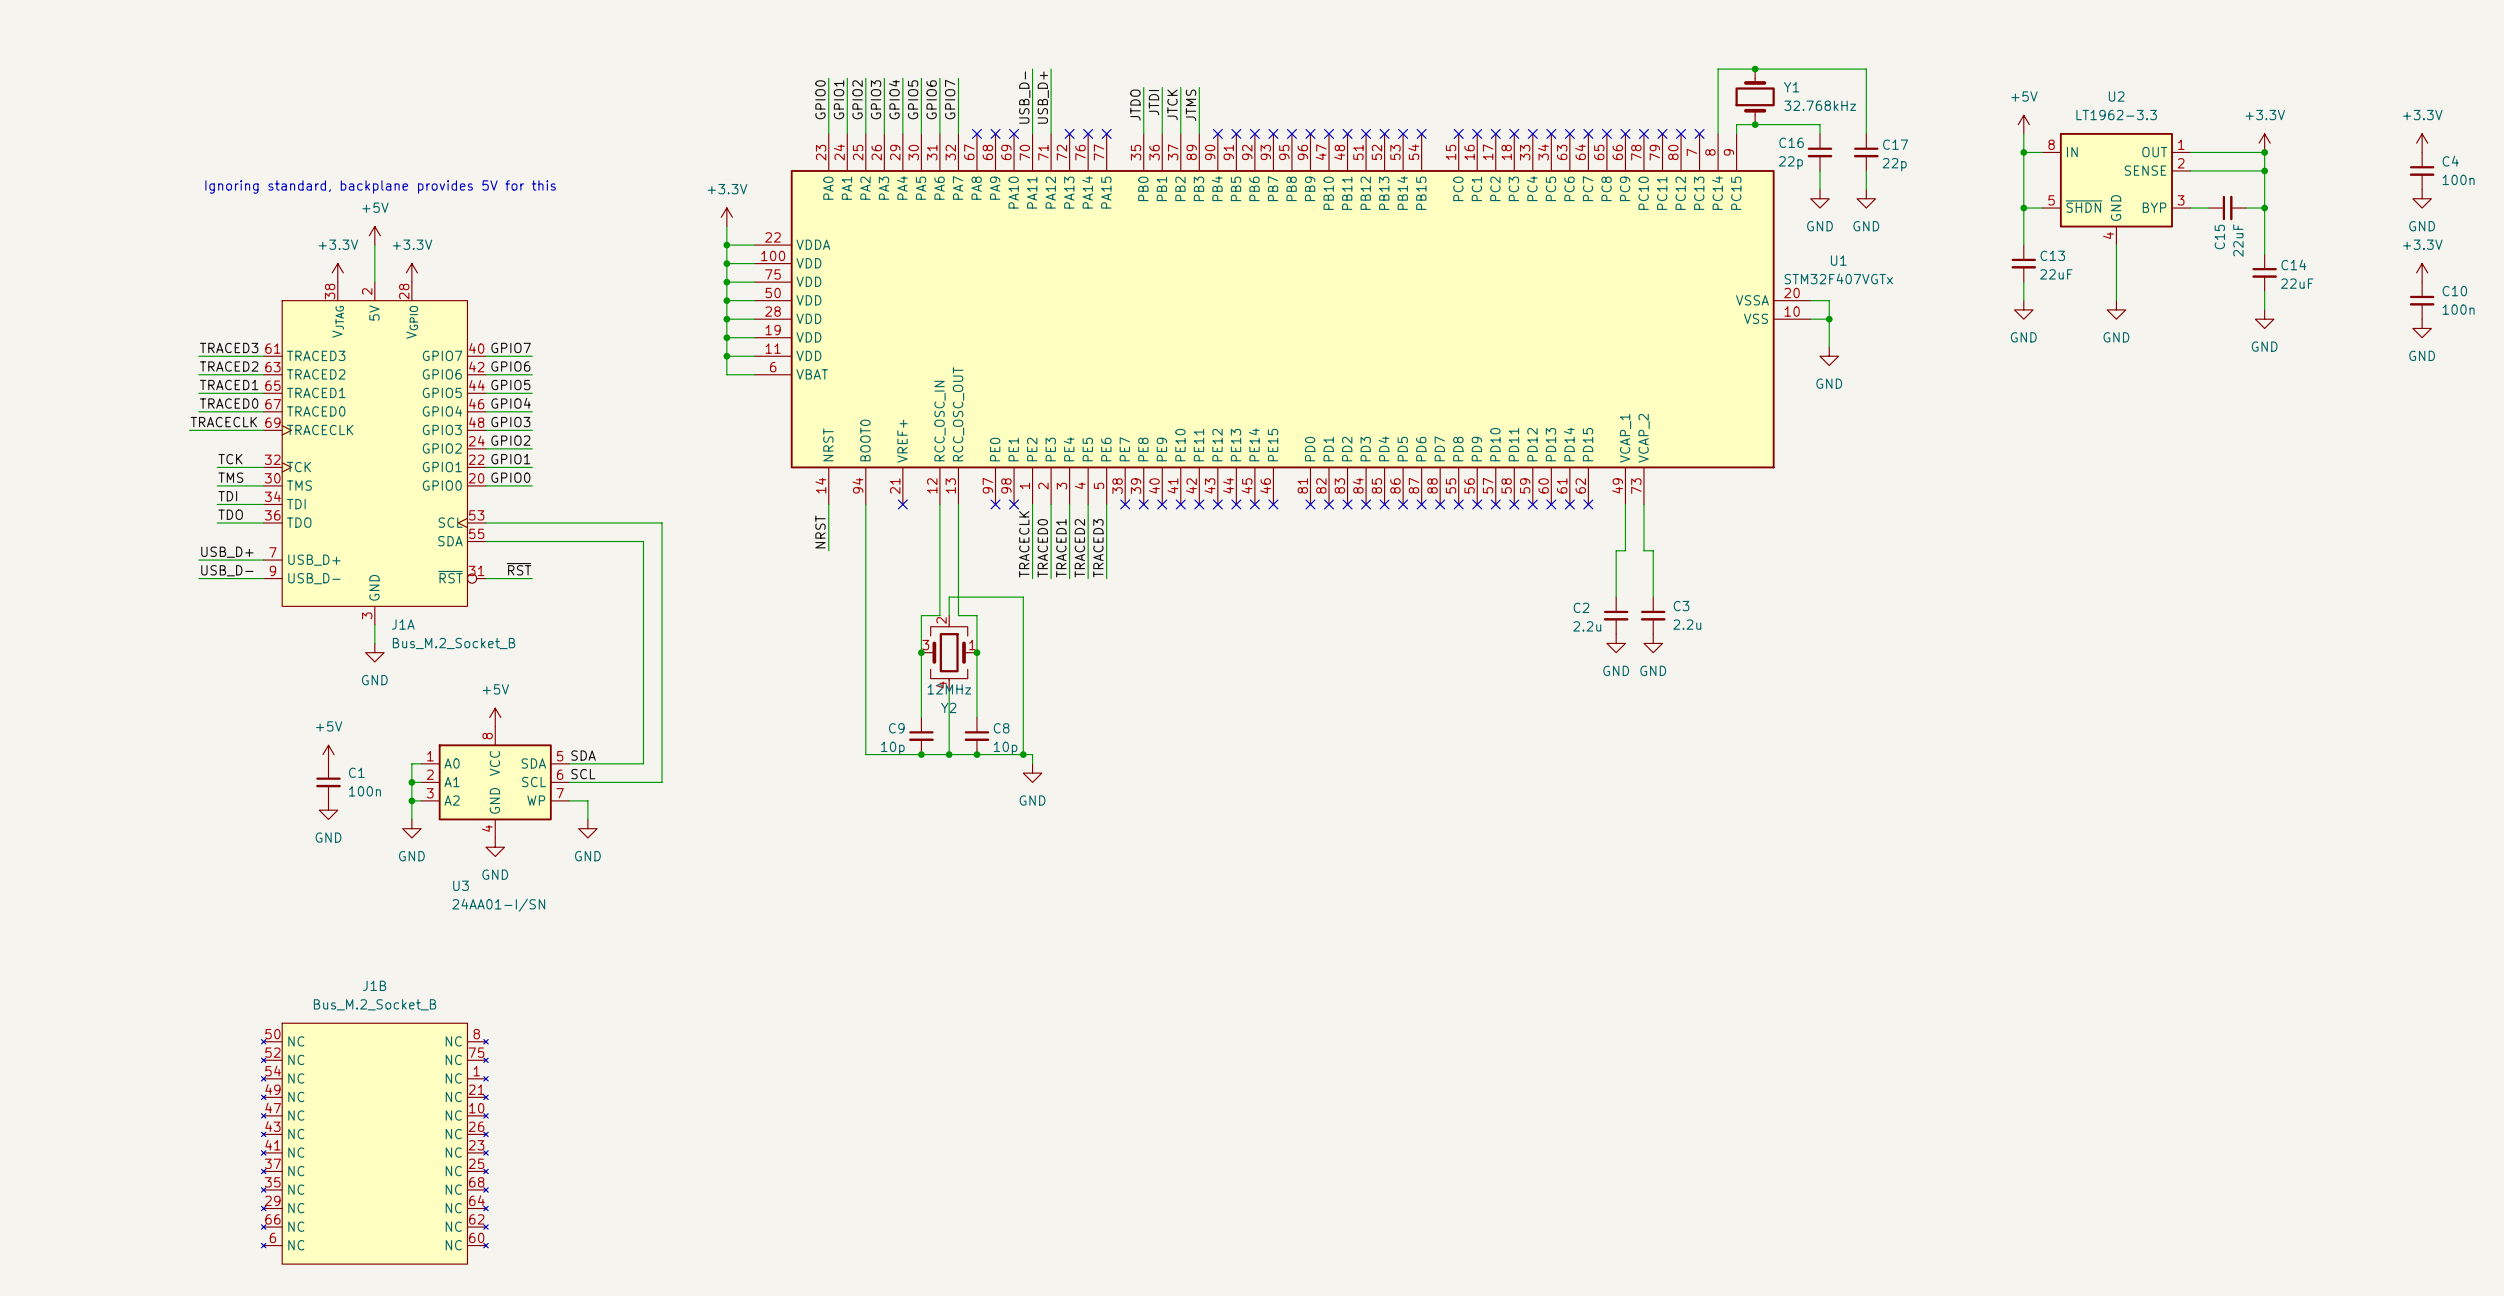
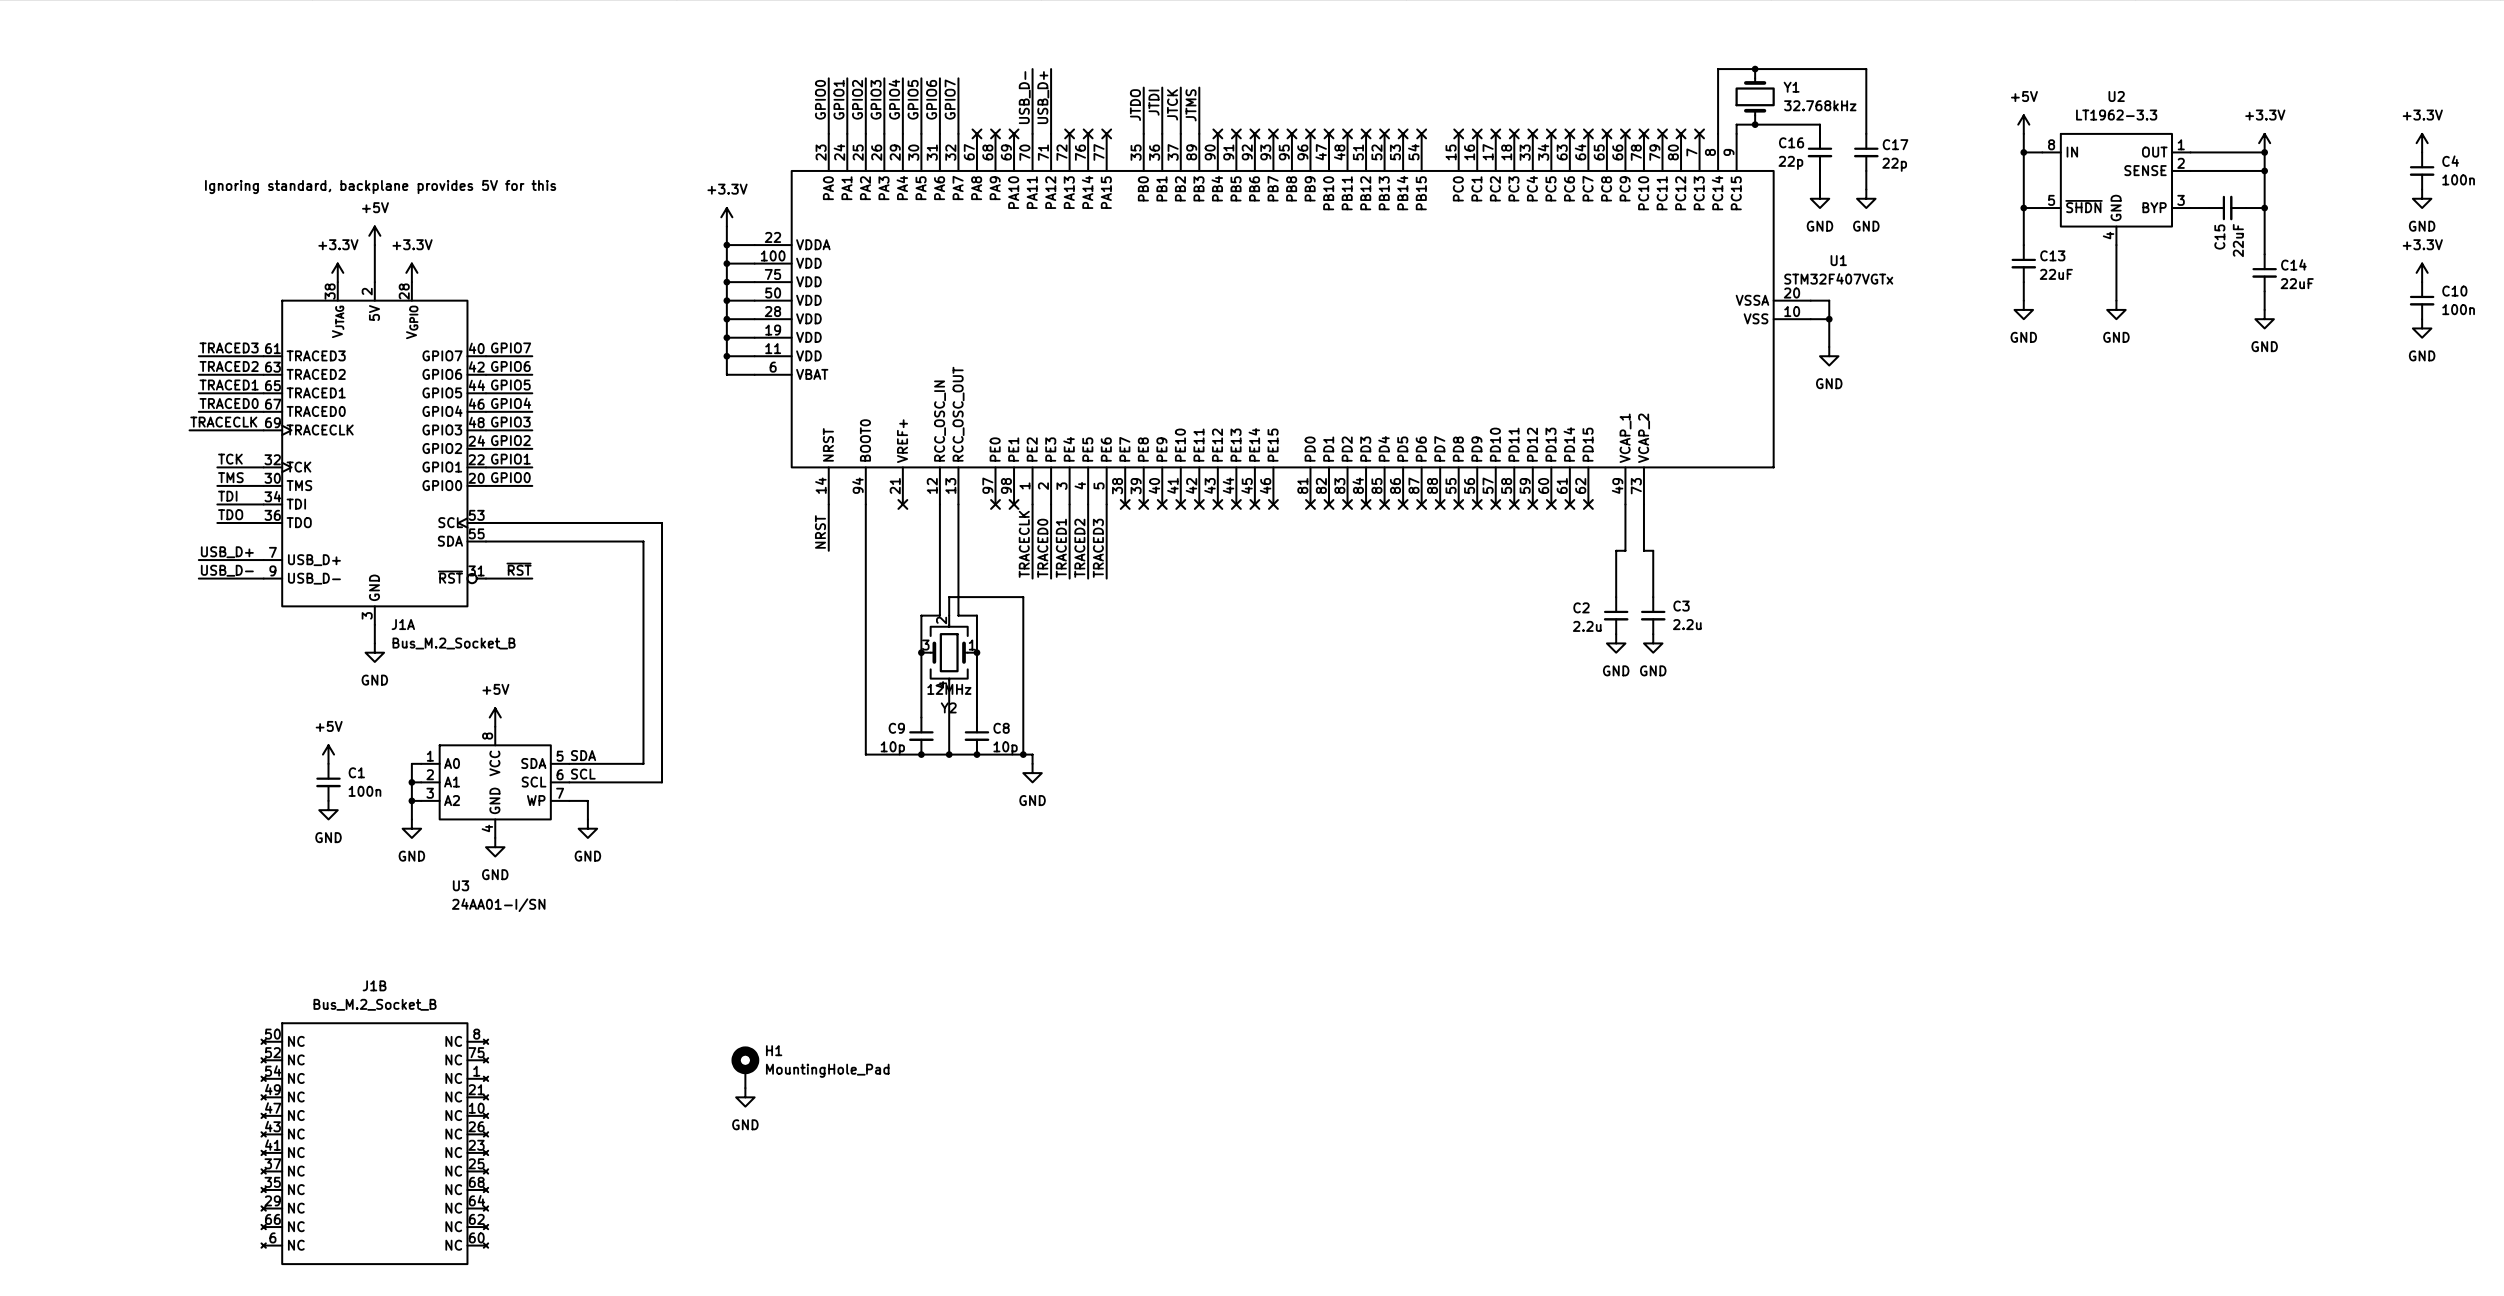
H1: none -> MountingHole_Pad (745, 1067)
power symbol: none -> GND (745, 1097)

